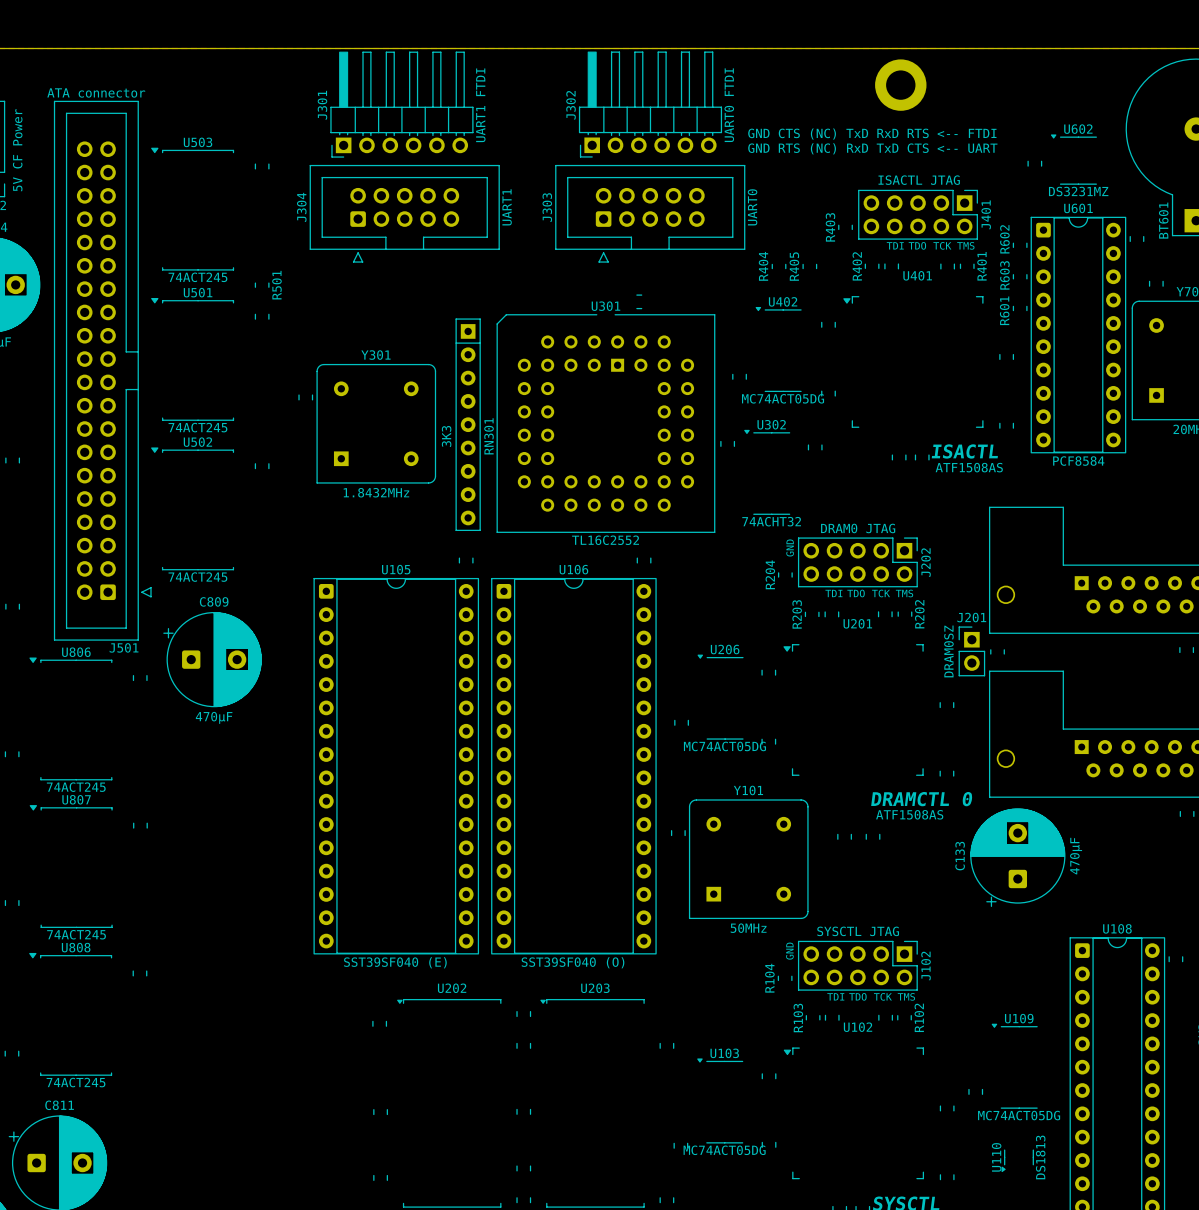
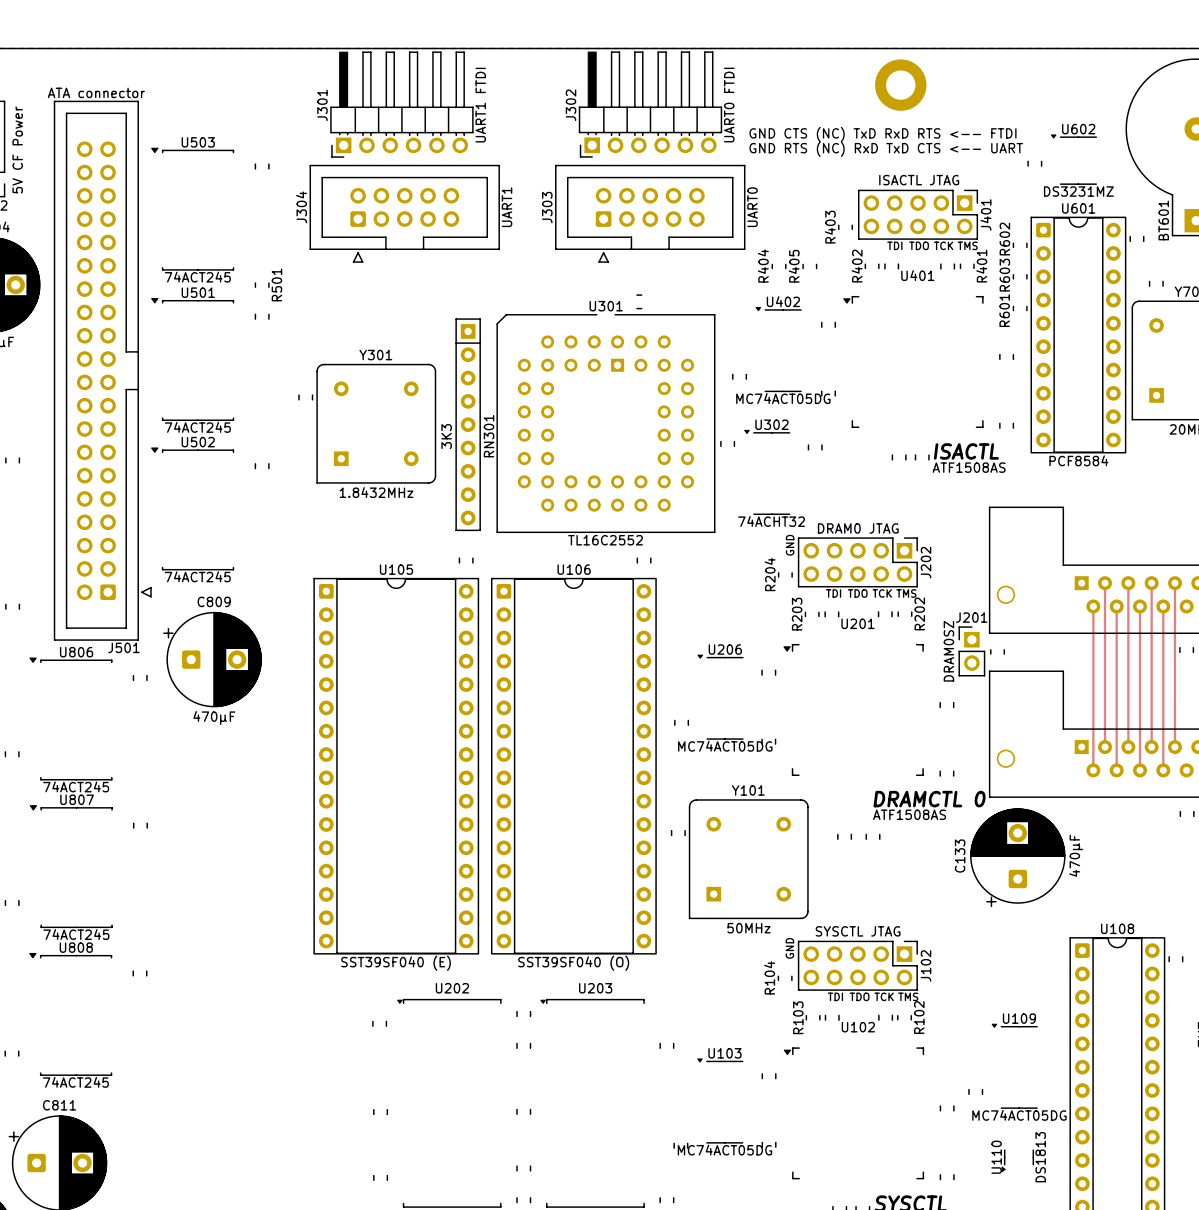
track: none -> (1105, 583) (1105, 747)
track: none -> (1128, 583) (1128, 747)
track: none -> (1151, 583) (1151, 747)
track: none -> (1174, 583) (1174, 747)
track: none -> (1093, 606) (1093, 770)
track: none -> (1116, 606) (1116, 770)
track: none -> (1140, 606) (1140, 770)
track: none -> (1163, 606) (1163, 770)

